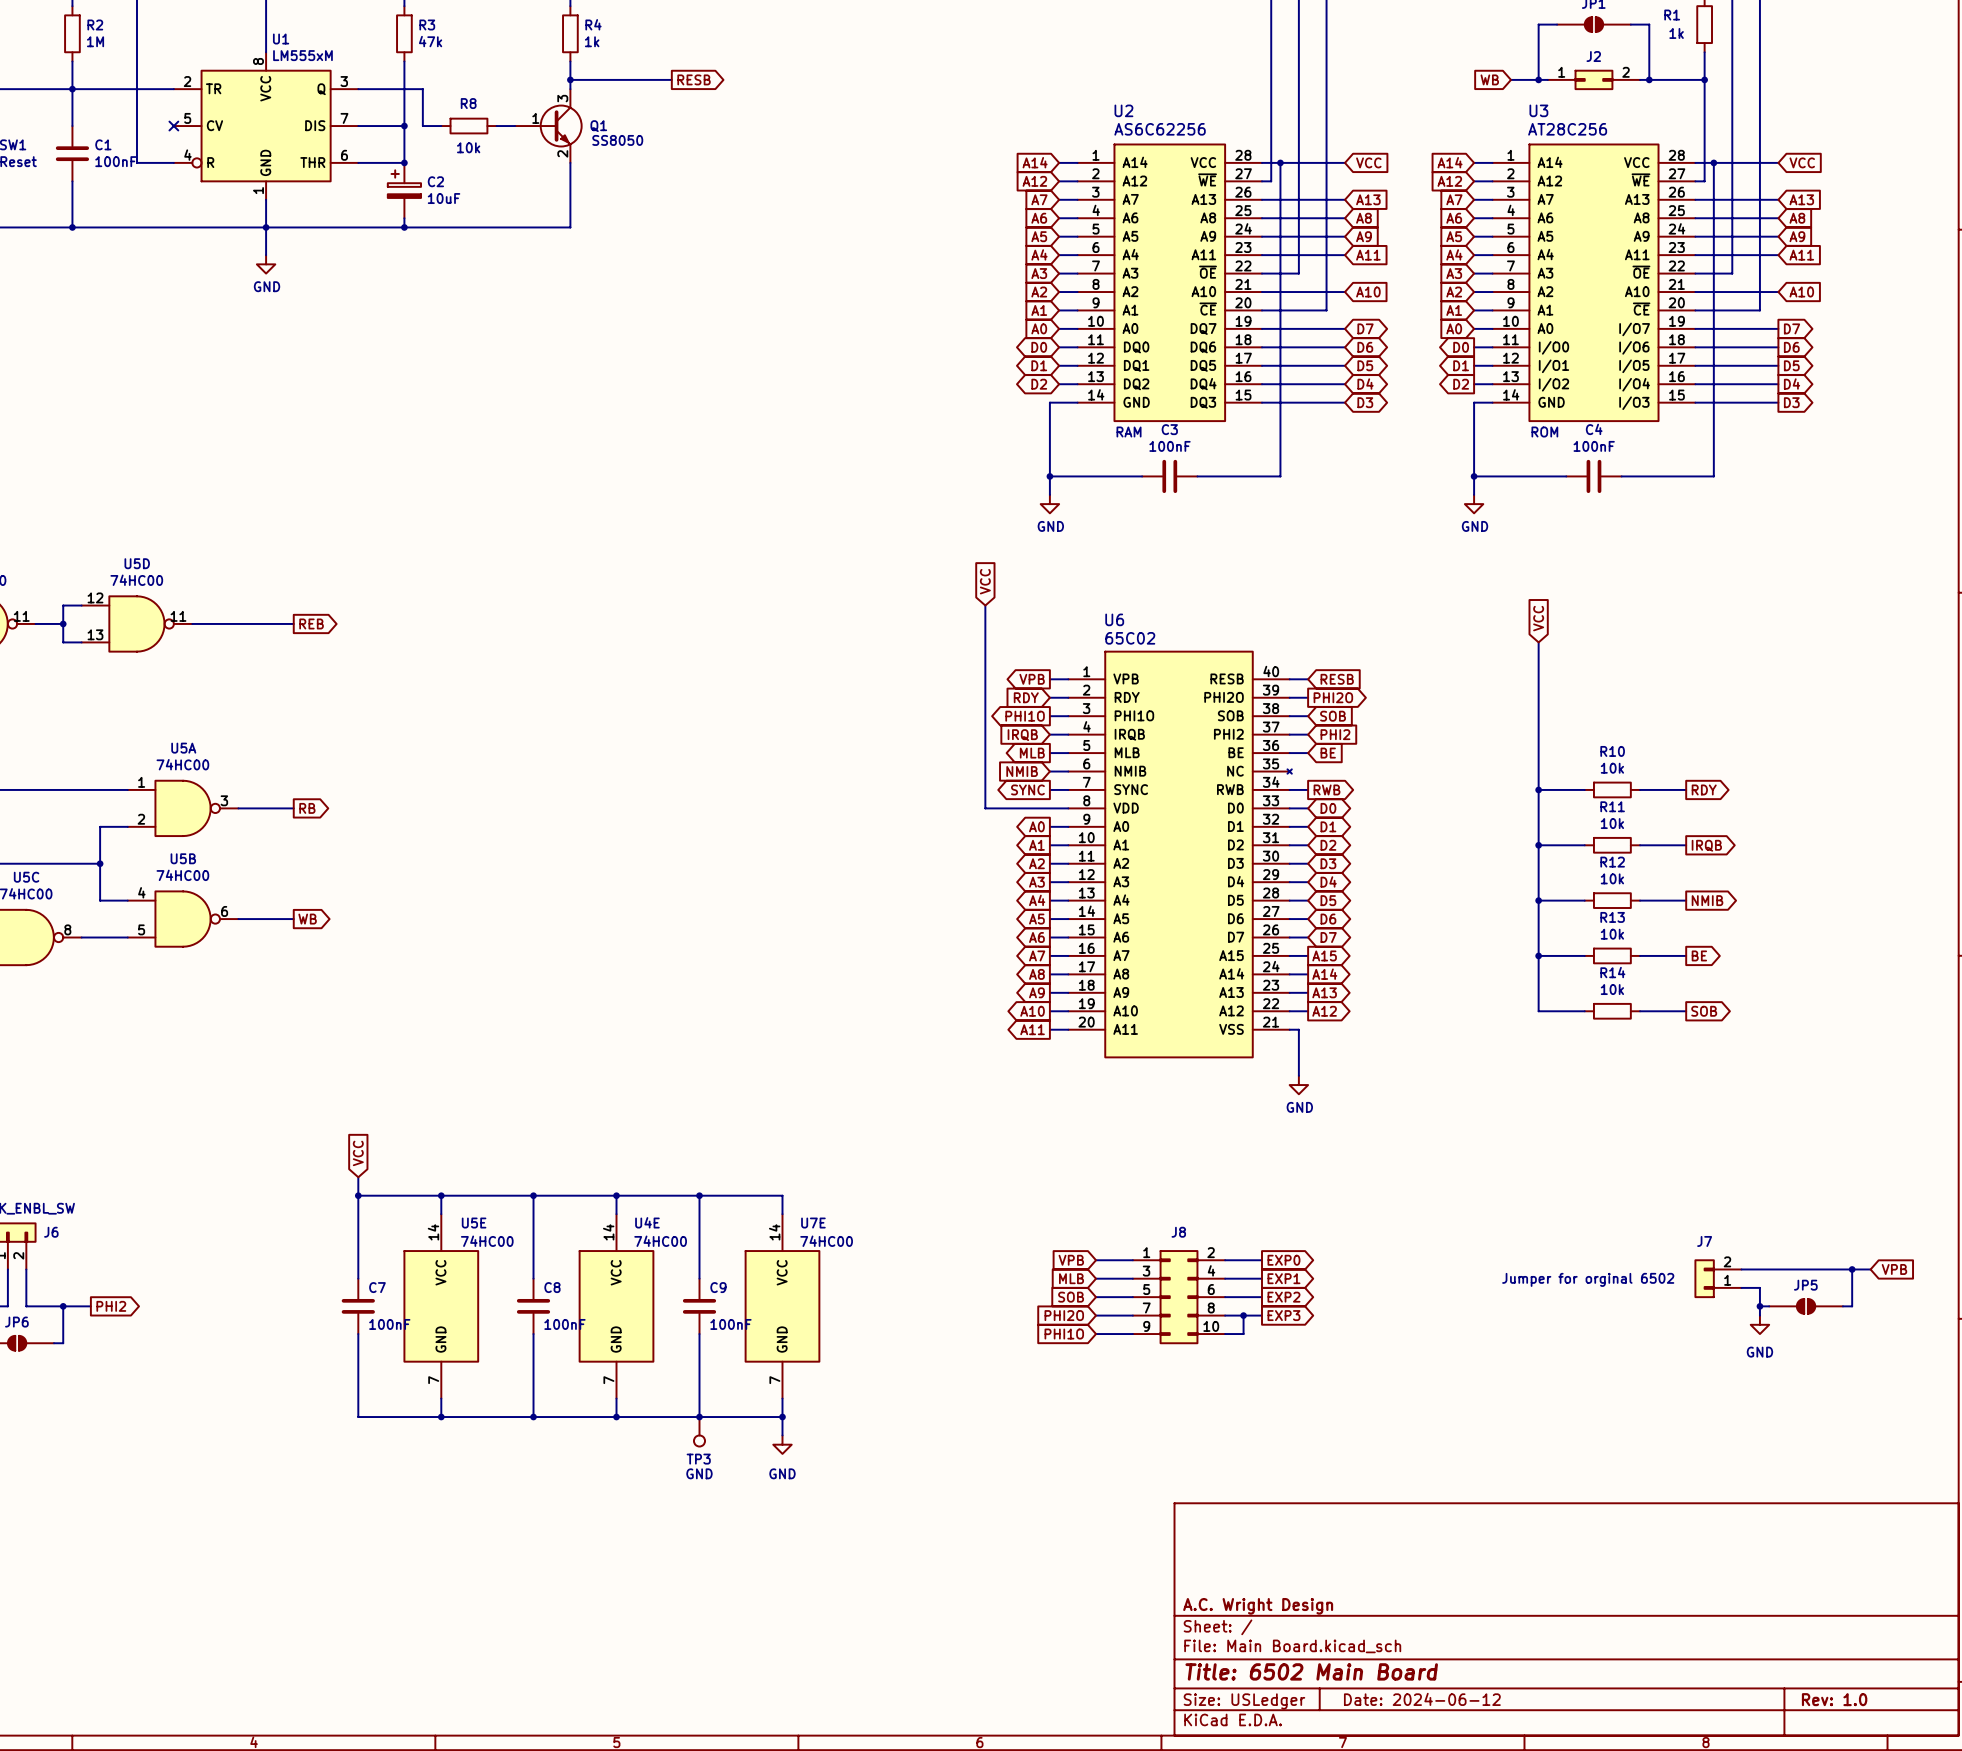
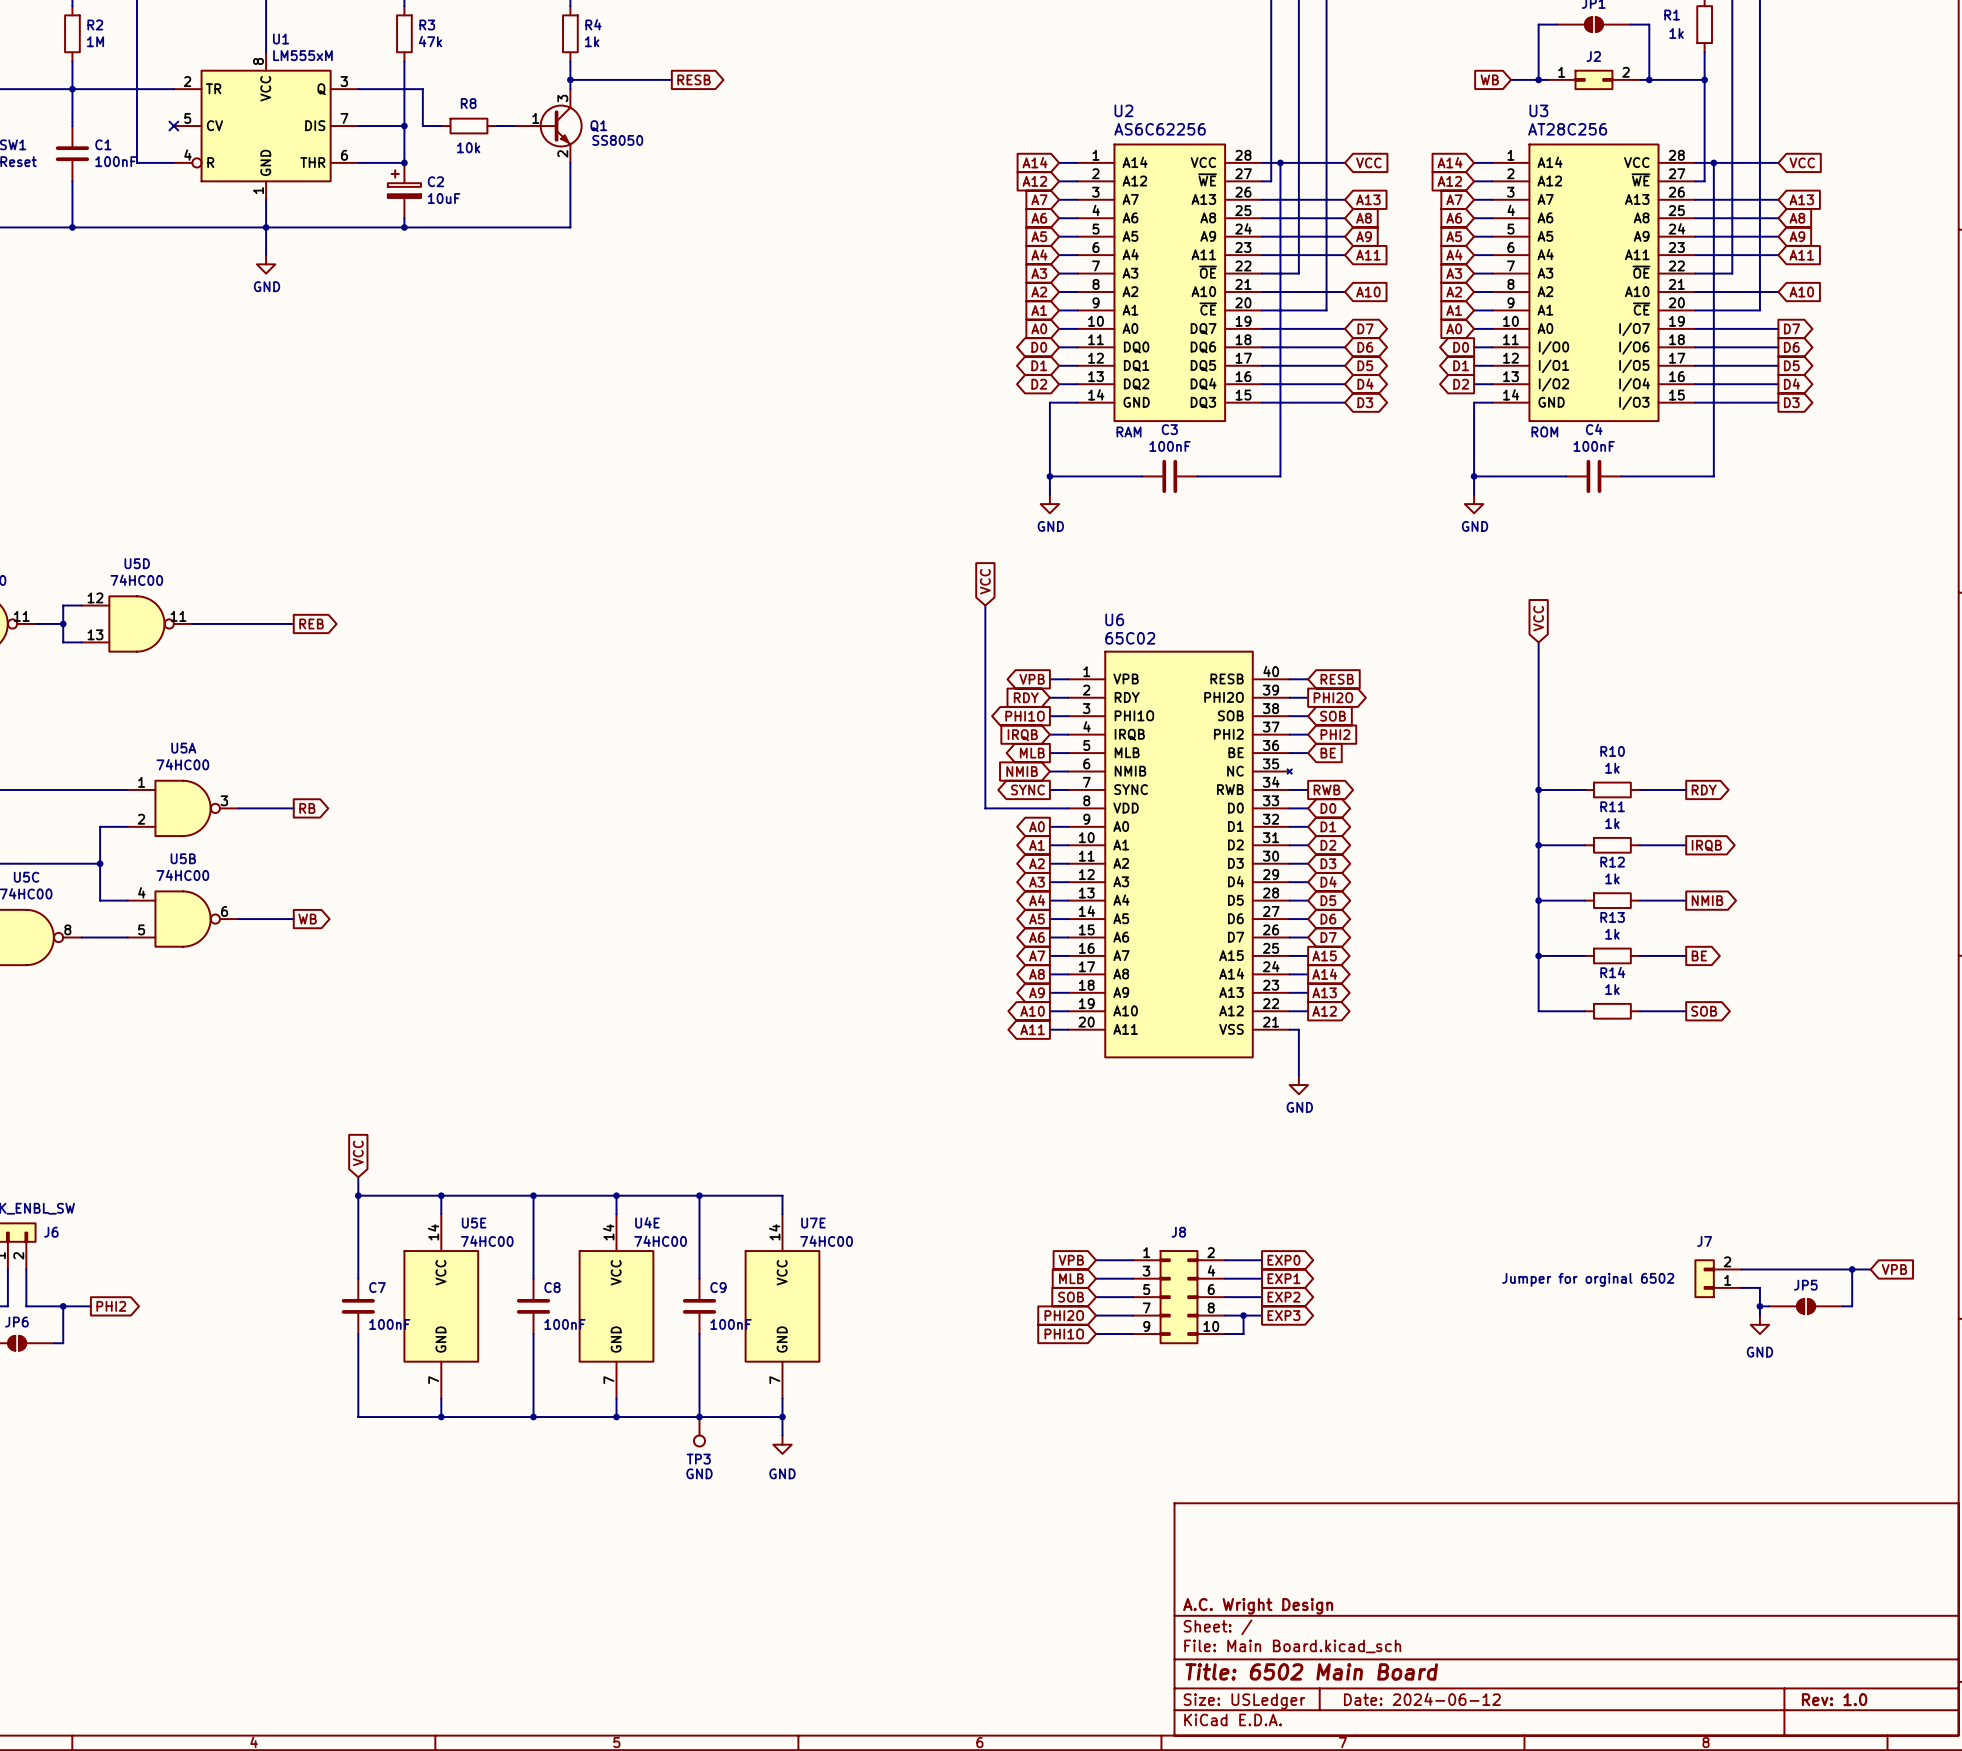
R10 value: 10k (1612, 768) -> 1k (1612, 768)
R11 value: 10k (1612, 823) -> 1k (1612, 823)
R12 value: 10k (1612, 878) -> 1k (1612, 878)
R13 value: 10k (1612, 934) -> 1k (1612, 934)
R14 value: 10k (1612, 989) -> 1k (1612, 989)

